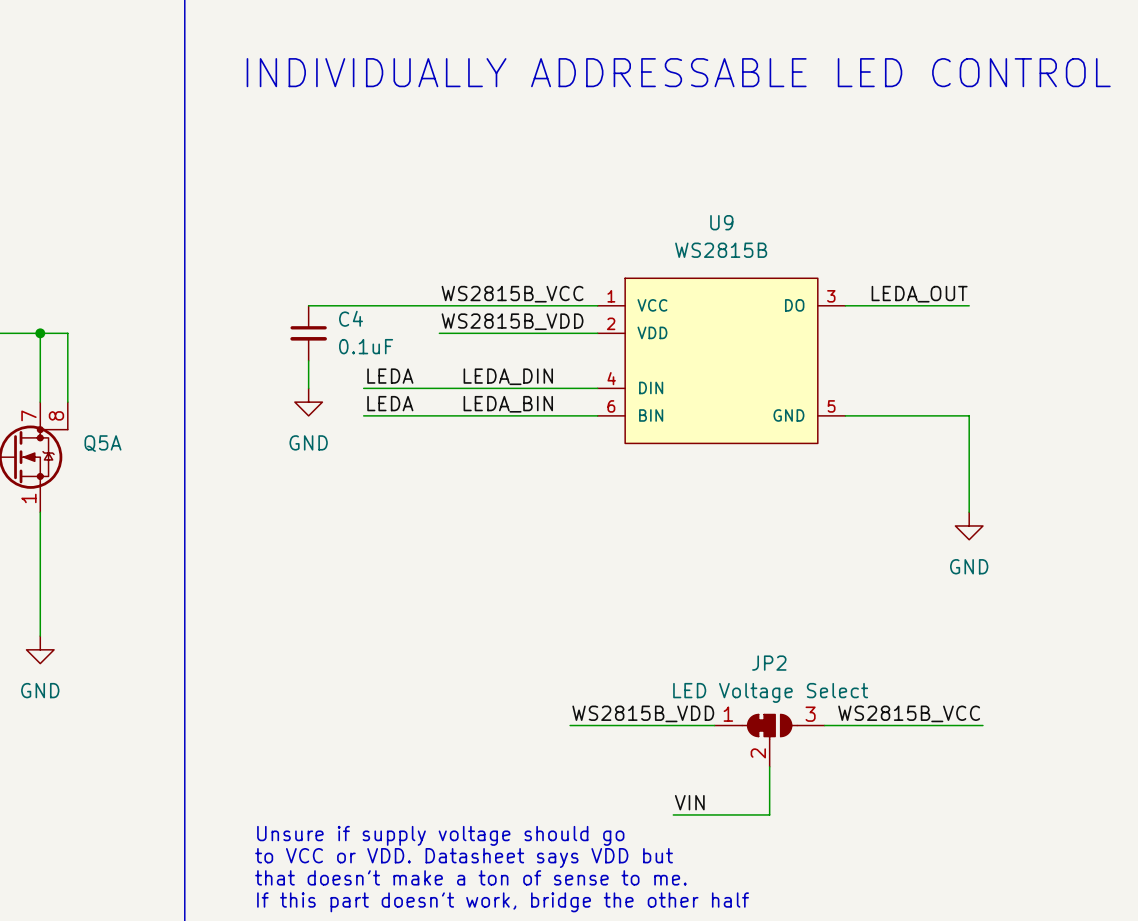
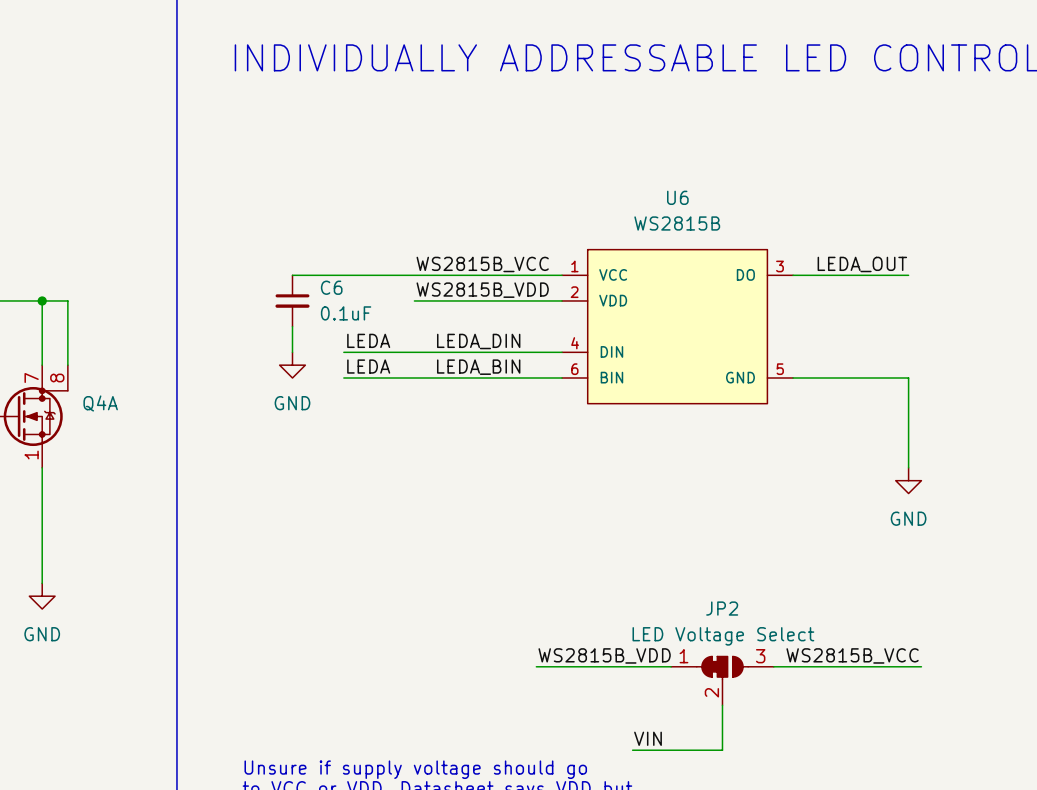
U9 name: U9 (721, 222) -> U6 (677, 197)
C4 name: C4 (351, 318) -> C6 (331, 287)
Q5A name: Q5A (102, 443) -> Q4A (100, 403)

